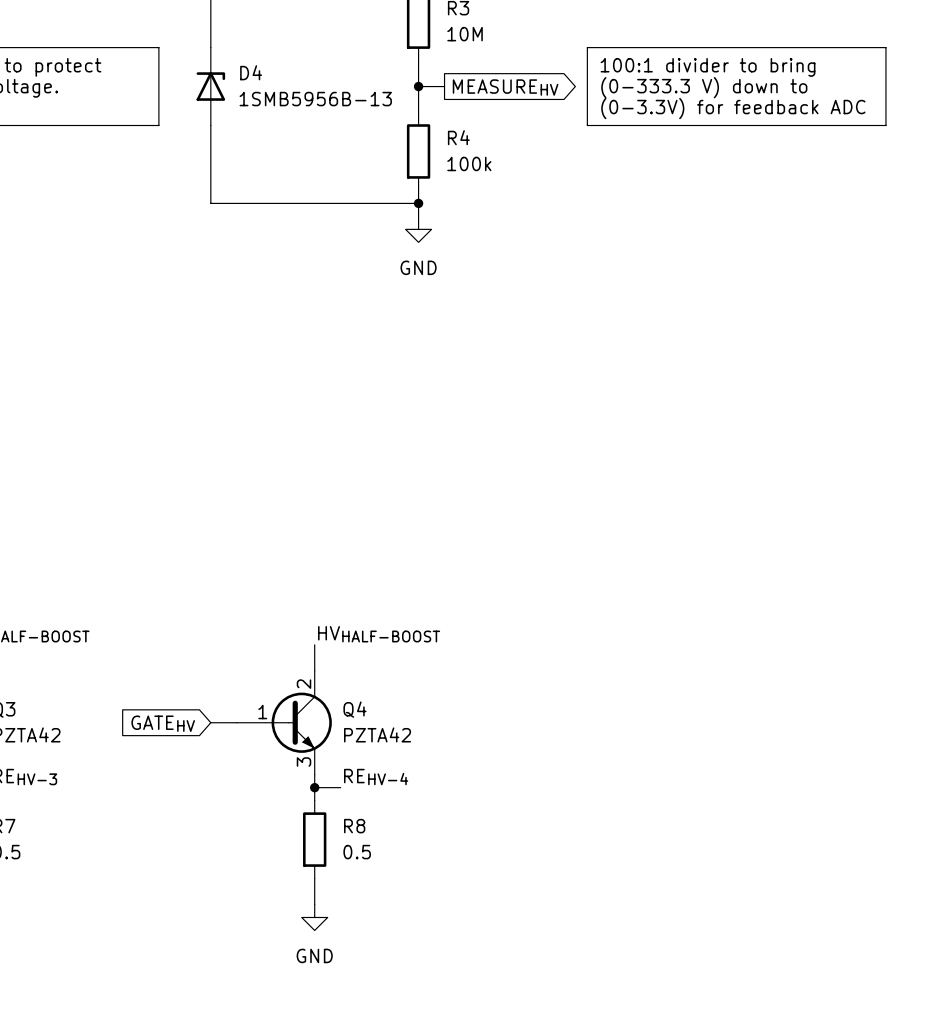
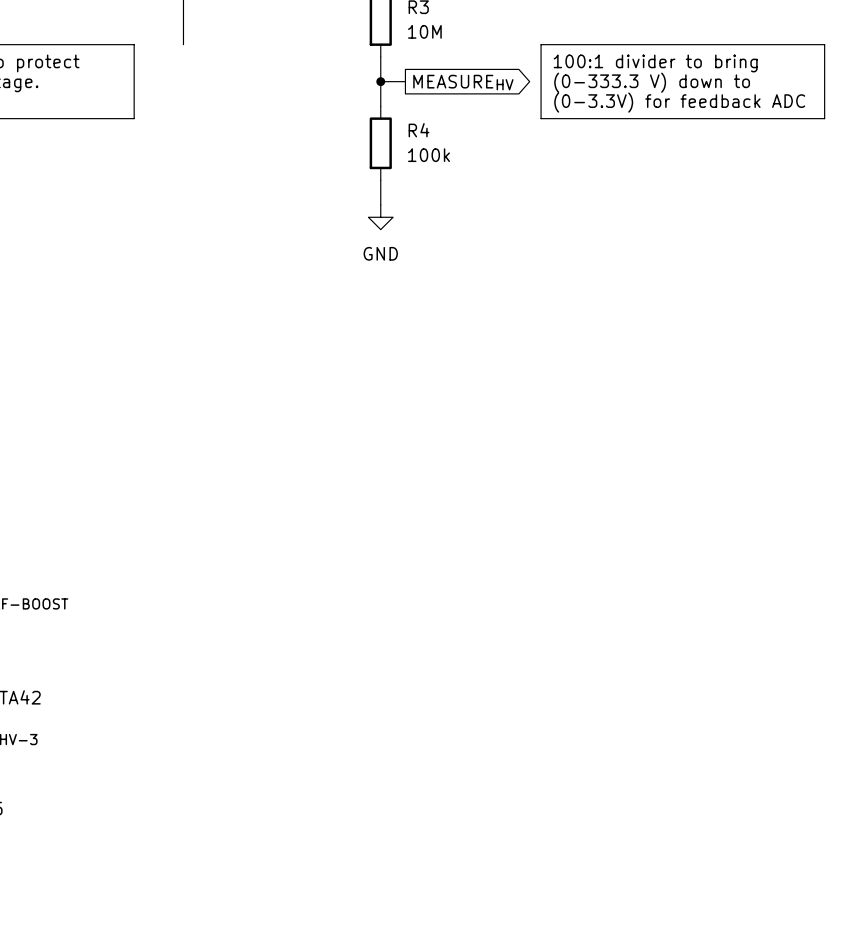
D4: 1SMB5956B-13 (210, 86) -> none
wire: (210, 125) (210, 203) (418, 203) -> none
junction: (418, 203) -> none
label: HVHALF-BOOST (379, 634) -> none
wire: (314, 644) (314, 670) -> none
wire: (210, 722) (236, 722) -> none
Q4: PZTA42 (284, 722) -> none
global label: GATEHV (163, 723) -> none
wire: (314, 774) (314, 800) -> none
label: REHV-4 (376, 777) -> none
wire: (314, 787) (340, 787) -> none
junction: (314, 787) -> none
R8: 0.5 (314, 839) -> none
wire: (314, 878) (314, 904) -> none
power symbol: GND (314, 917) -> none

